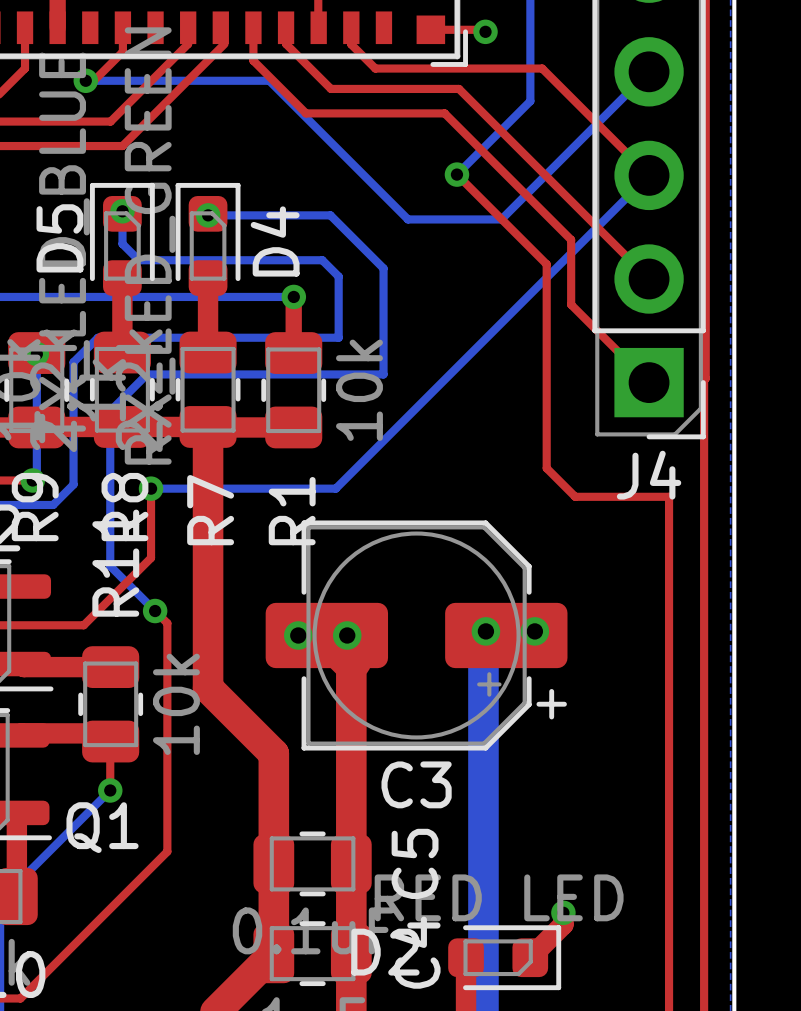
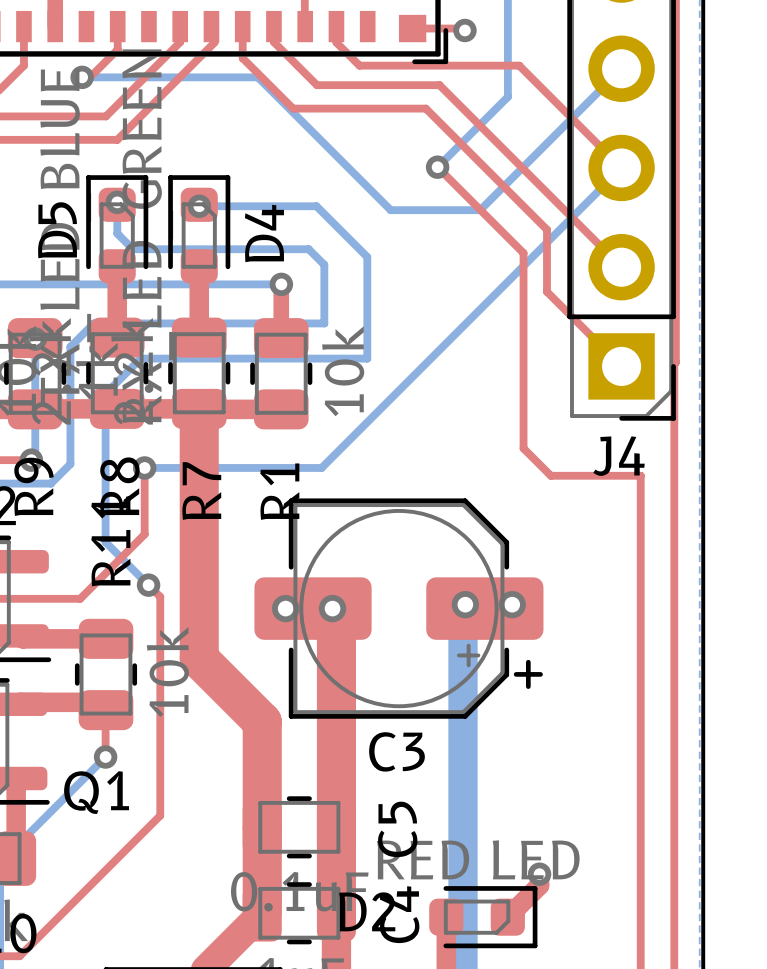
top track width: thin (208, 426) (208, 688) (273, 753) (273, 953) -> thick (199, 408) (199, 658) (262, 721) (262, 913)
top track width: thin (351, 659) (351, 953) -> thick (336, 632) (336, 913)

